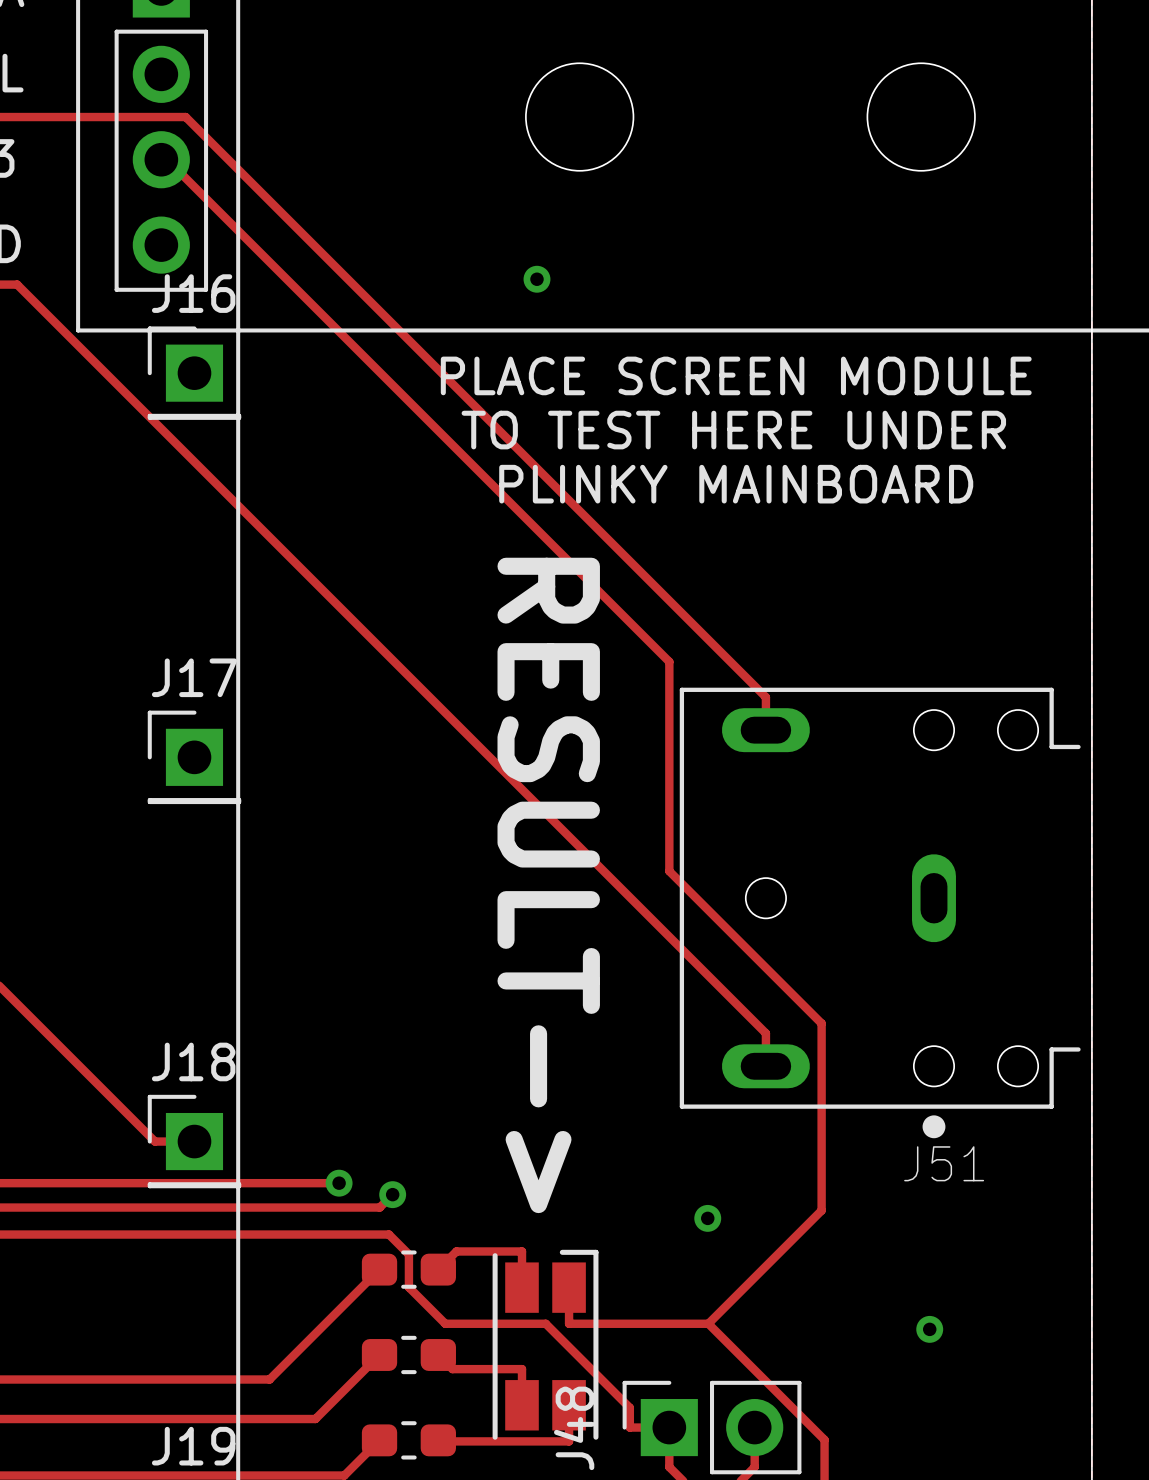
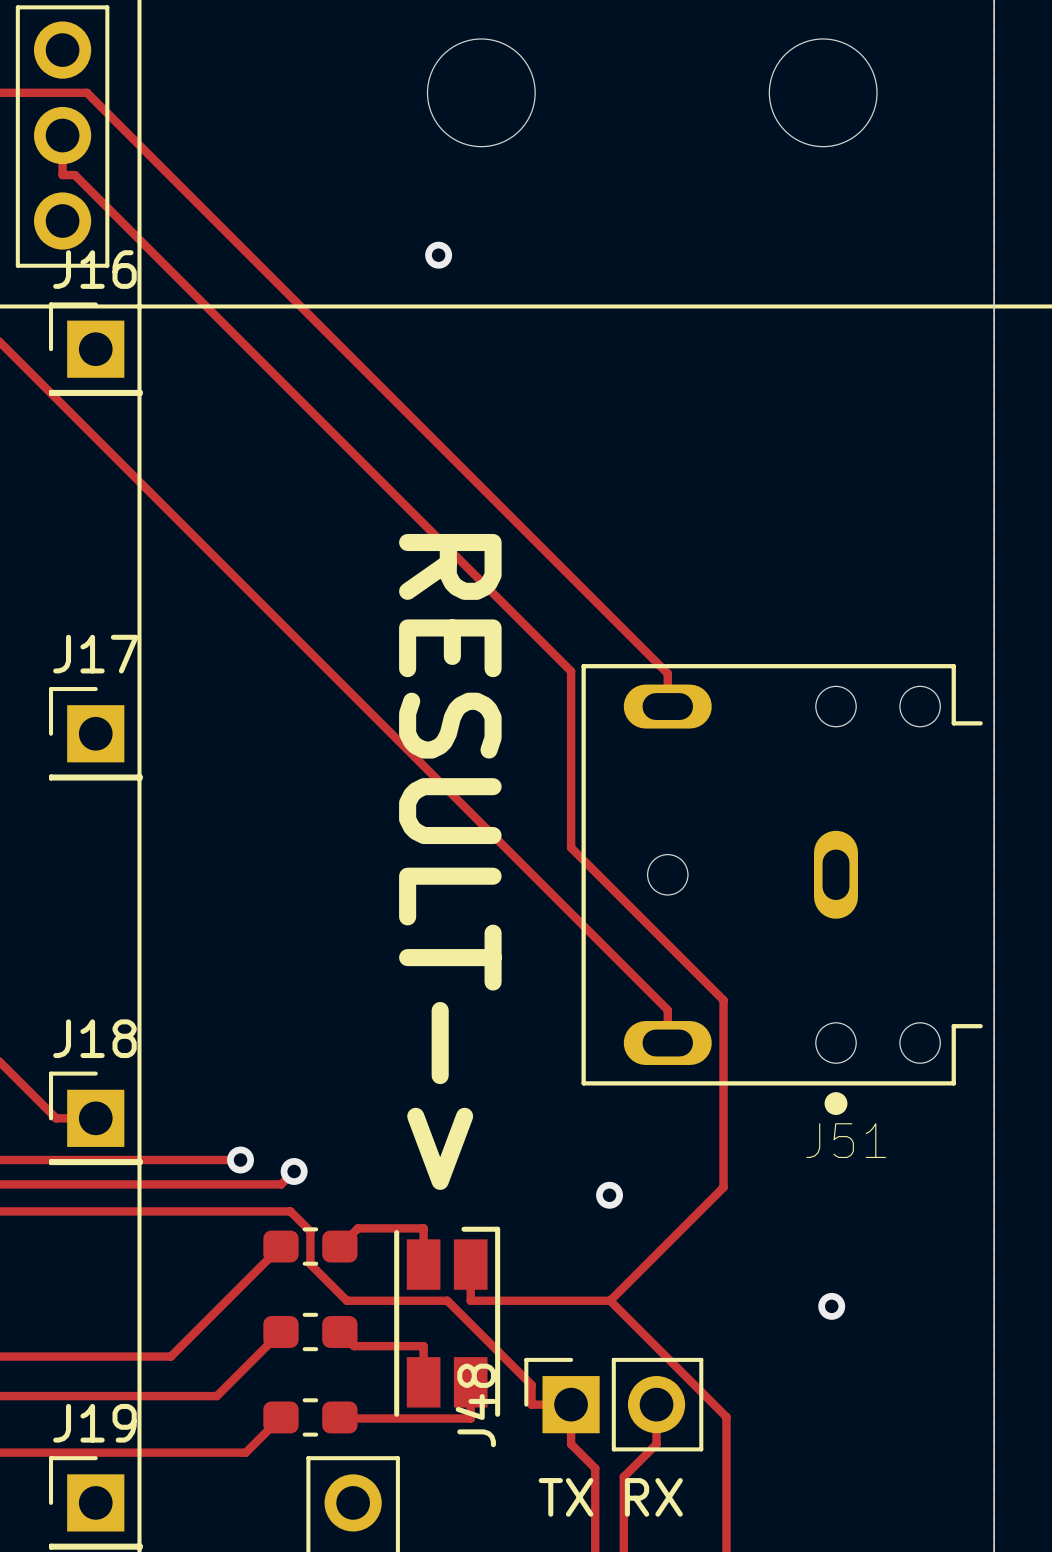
track: (161, 159) (167, 159) (669, 661) (669, 694) -> (62, 135) (62, 175) (74, 175) (571, 671)
text: PLACE SCREEN MODULE (736, 375) -> none
text: TO TEST HERE UNDER (733, 430) -> none
text: PLINKY MAINBOARD (736, 484) -> none

